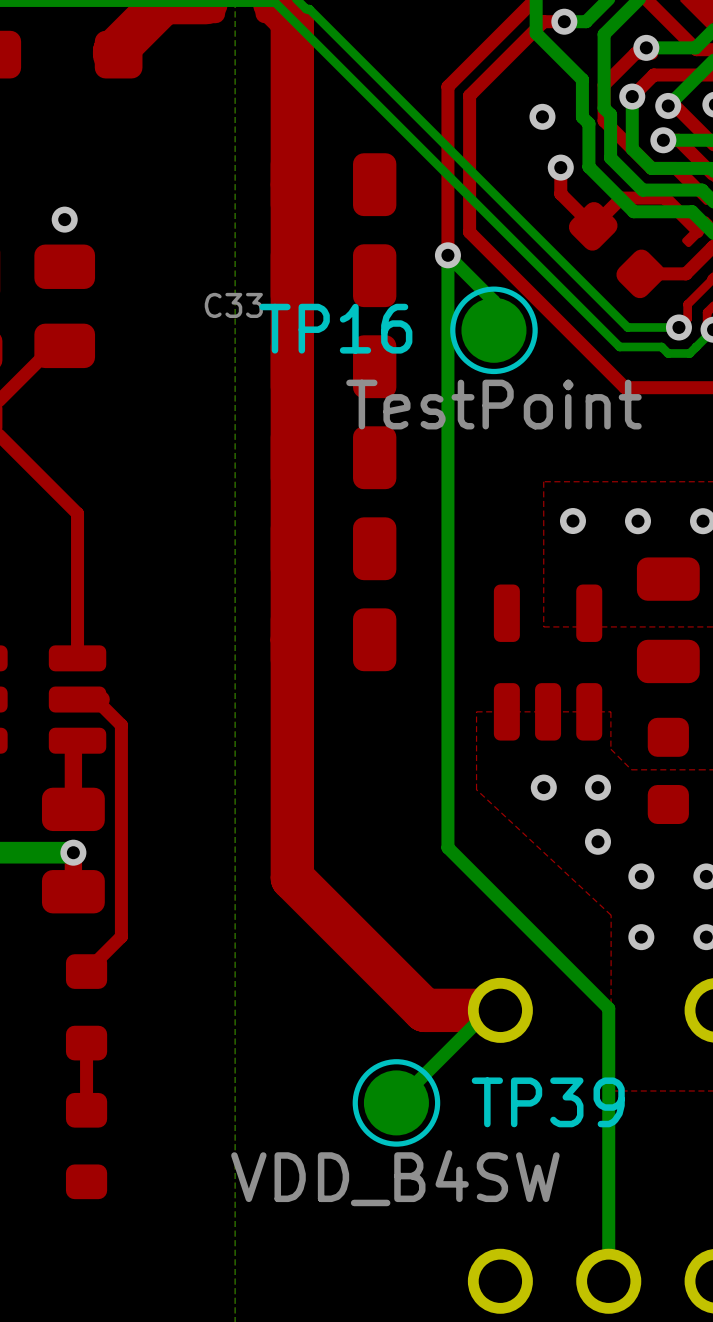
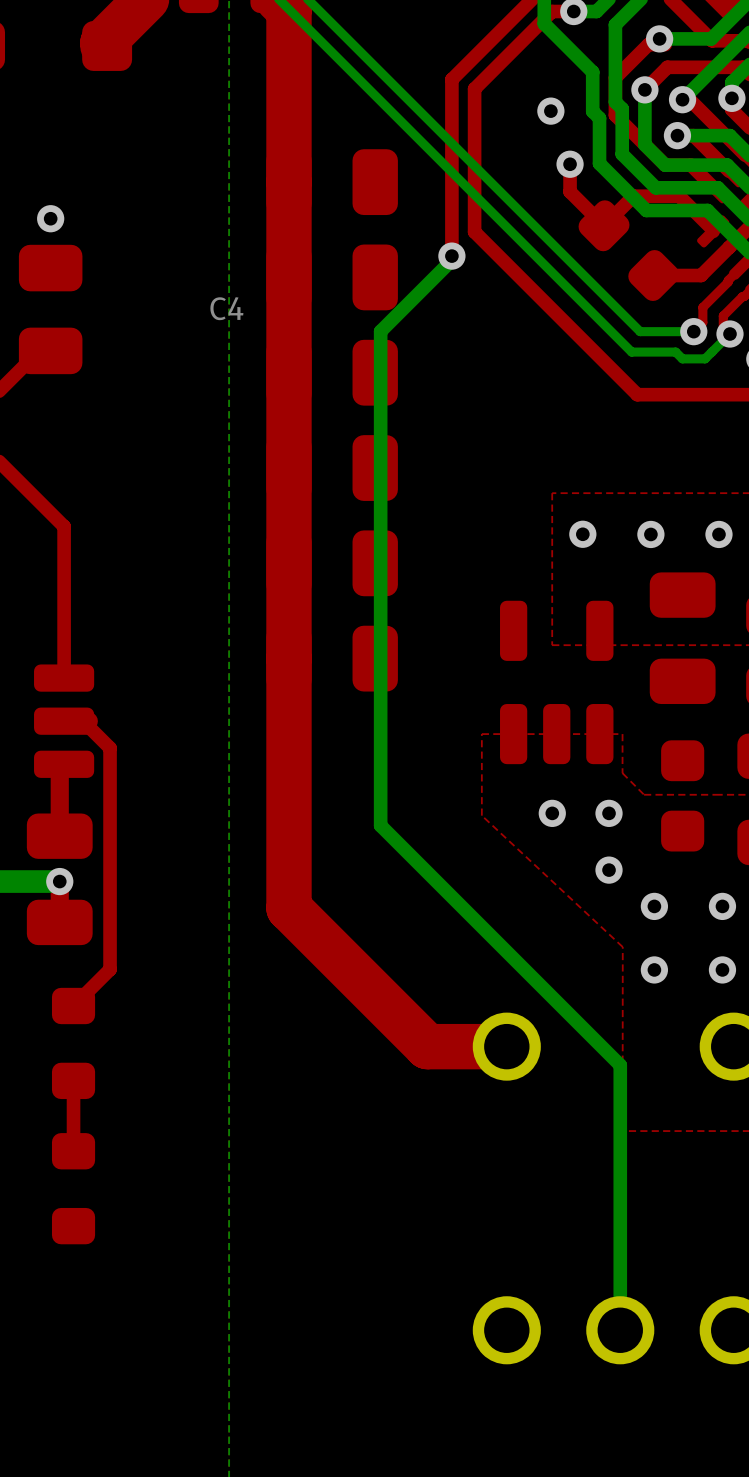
bottom track: (447, 255) (493, 301) (493, 330) -> none
bottom track: (447, 259) (447, 847) (608, 1008) (608, 1028) -> (451, 260) (380, 331) (380, 825) (620, 1065)
C33 name: C33 (233, 305) -> C4 (226, 308)
TP16: TestPoint (493, 330) -> none
bottom track: (500, 1010) (488, 1010) (396, 1102) -> none
TP39: VDD_B4SW (396, 1102) -> none

